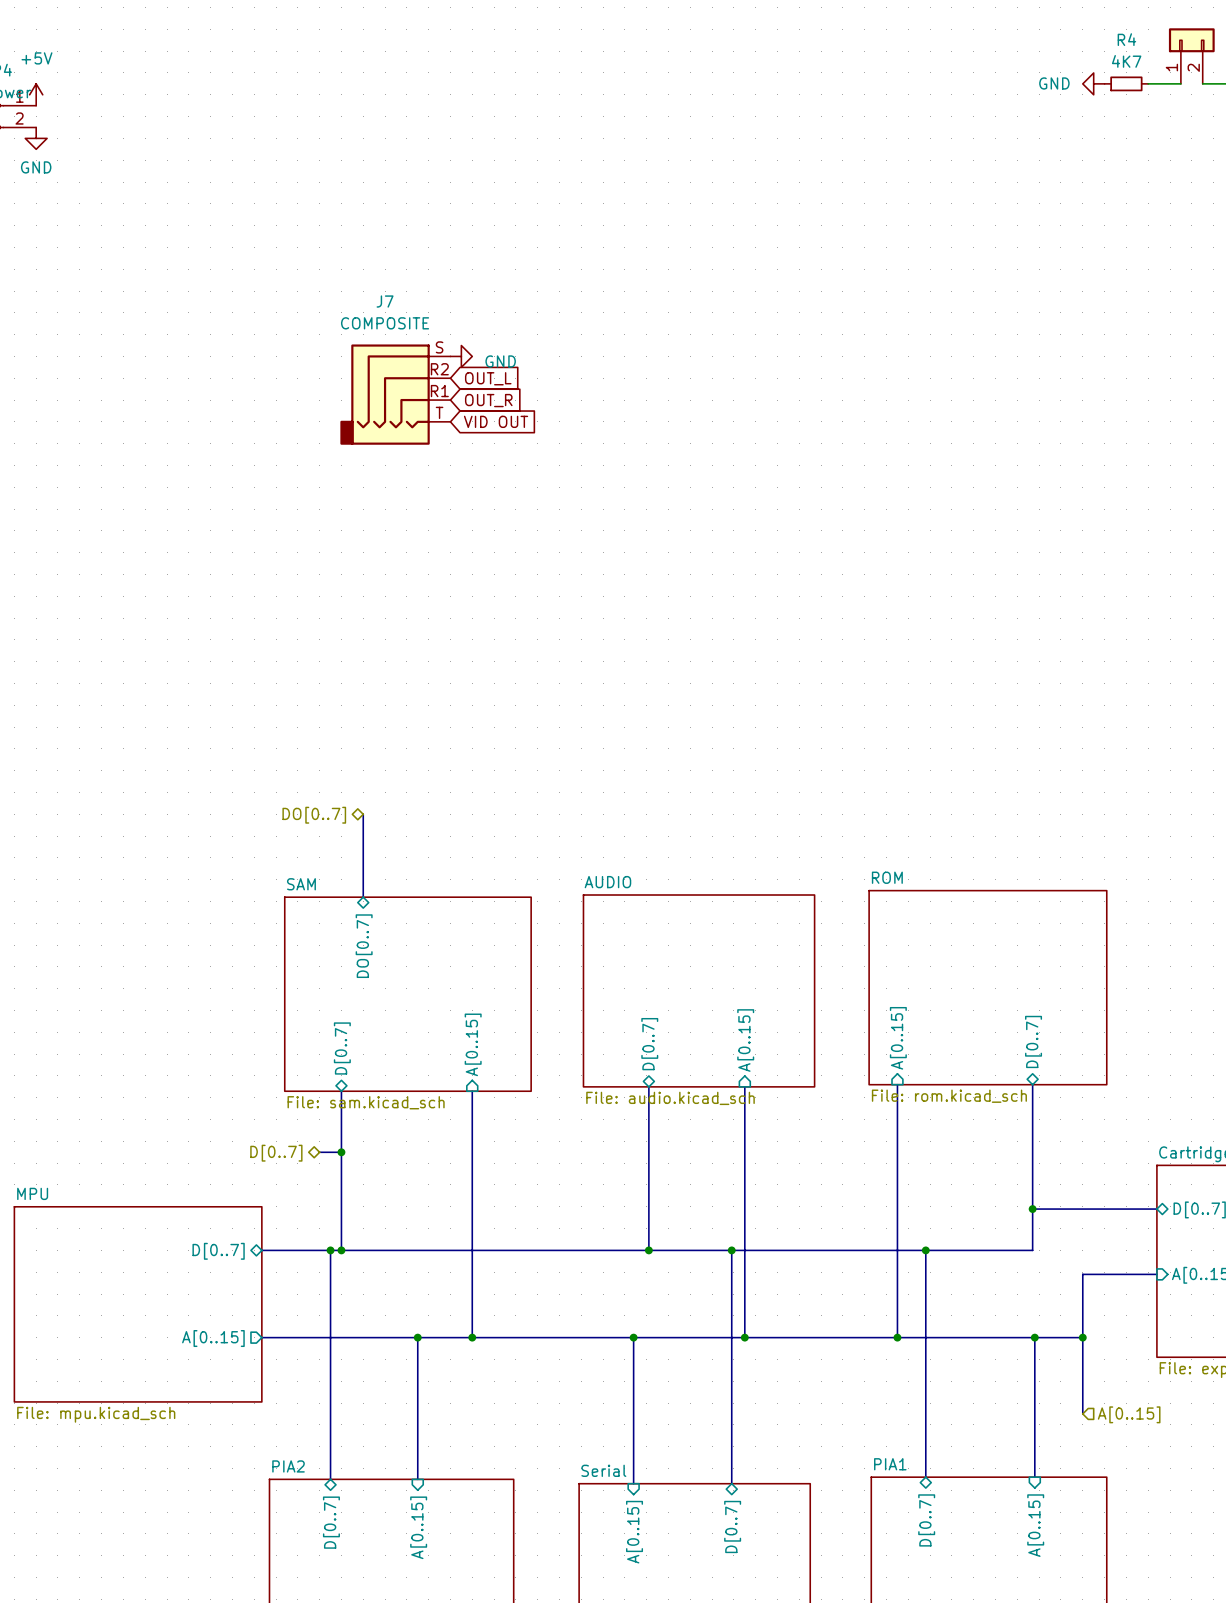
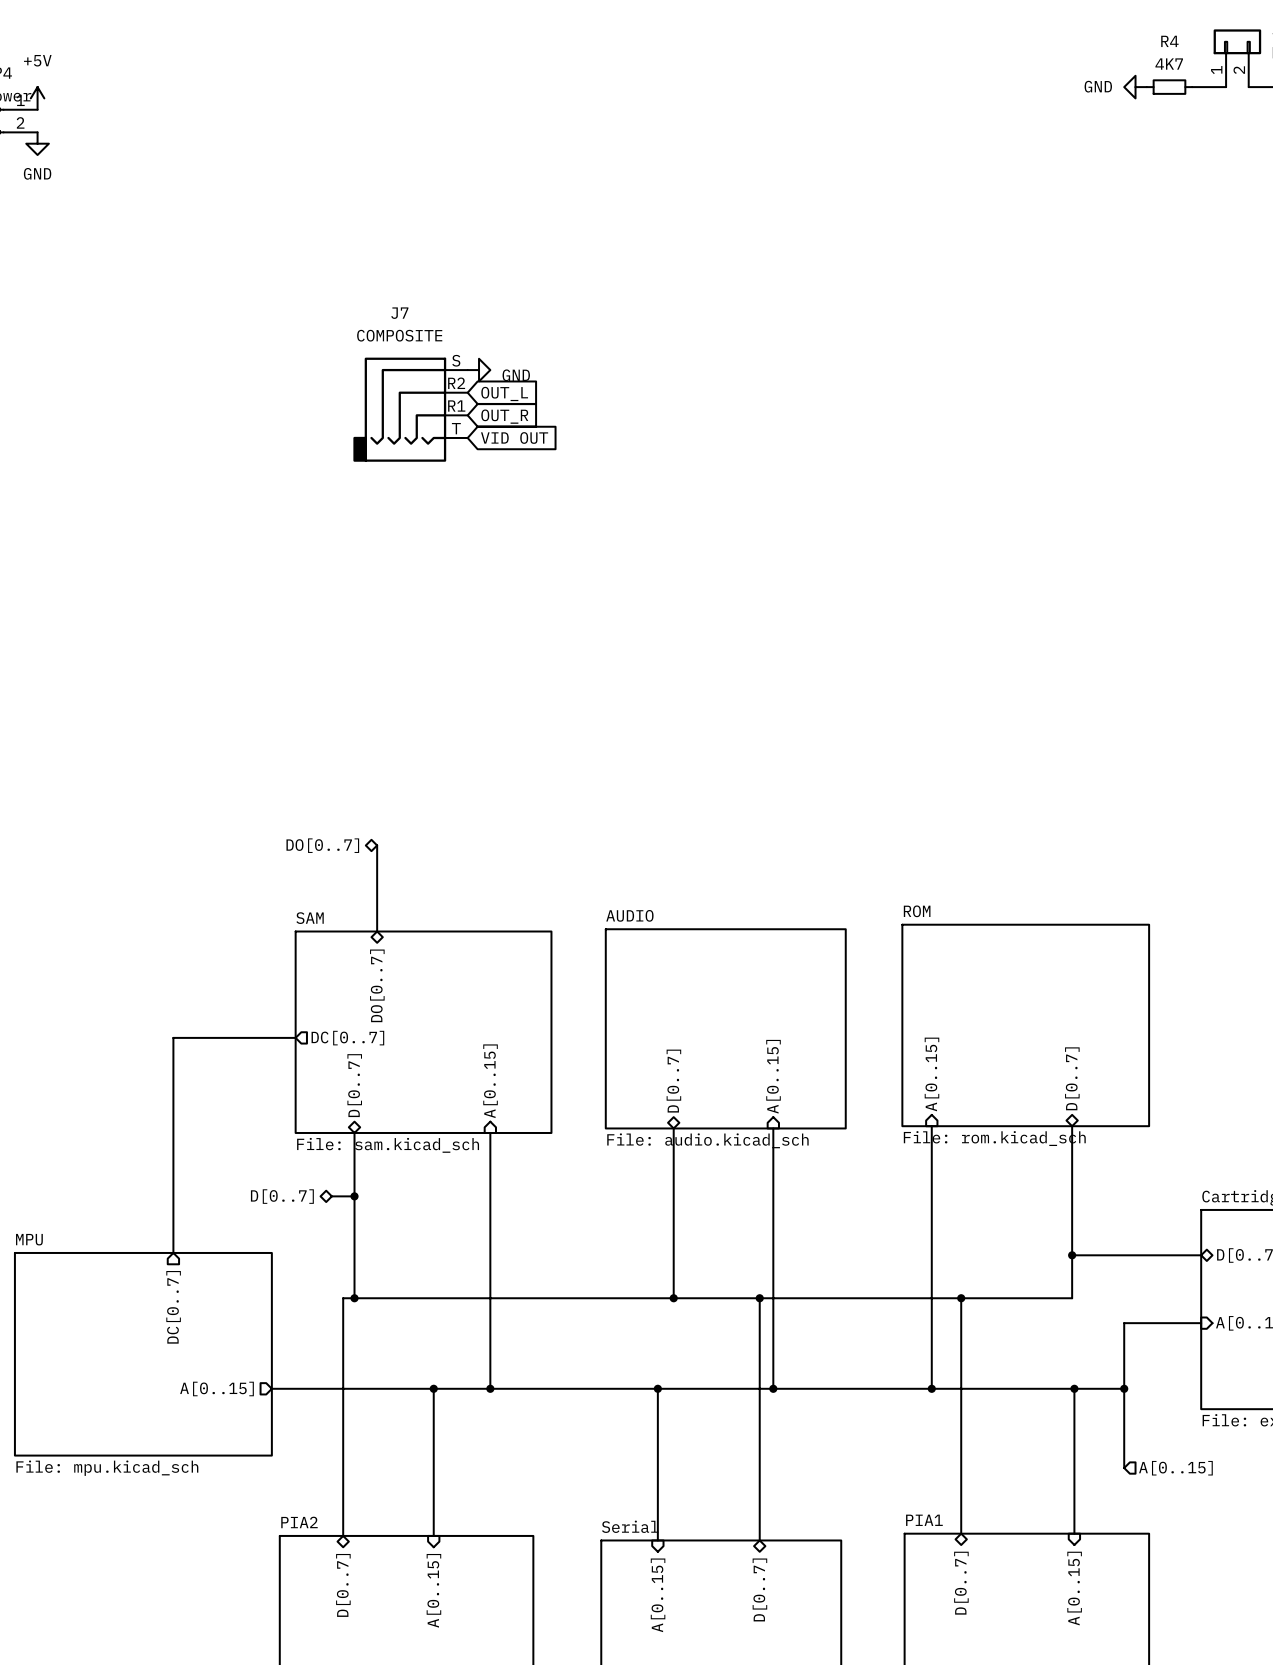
bus: none -> (295, 1037) (173, 1037) (173, 1252)
sheet pin: none -> DC[0..7] (347, 1038)
bus: (261, 1250) (330, 1250) -> none
junction: (330, 1250) -> none
sheet pin shape: bidirectional (218, 1251) -> output (173, 1307)
sheet pin: D[0..7] (218, 1251) -> DC[0..7] (173, 1307)

